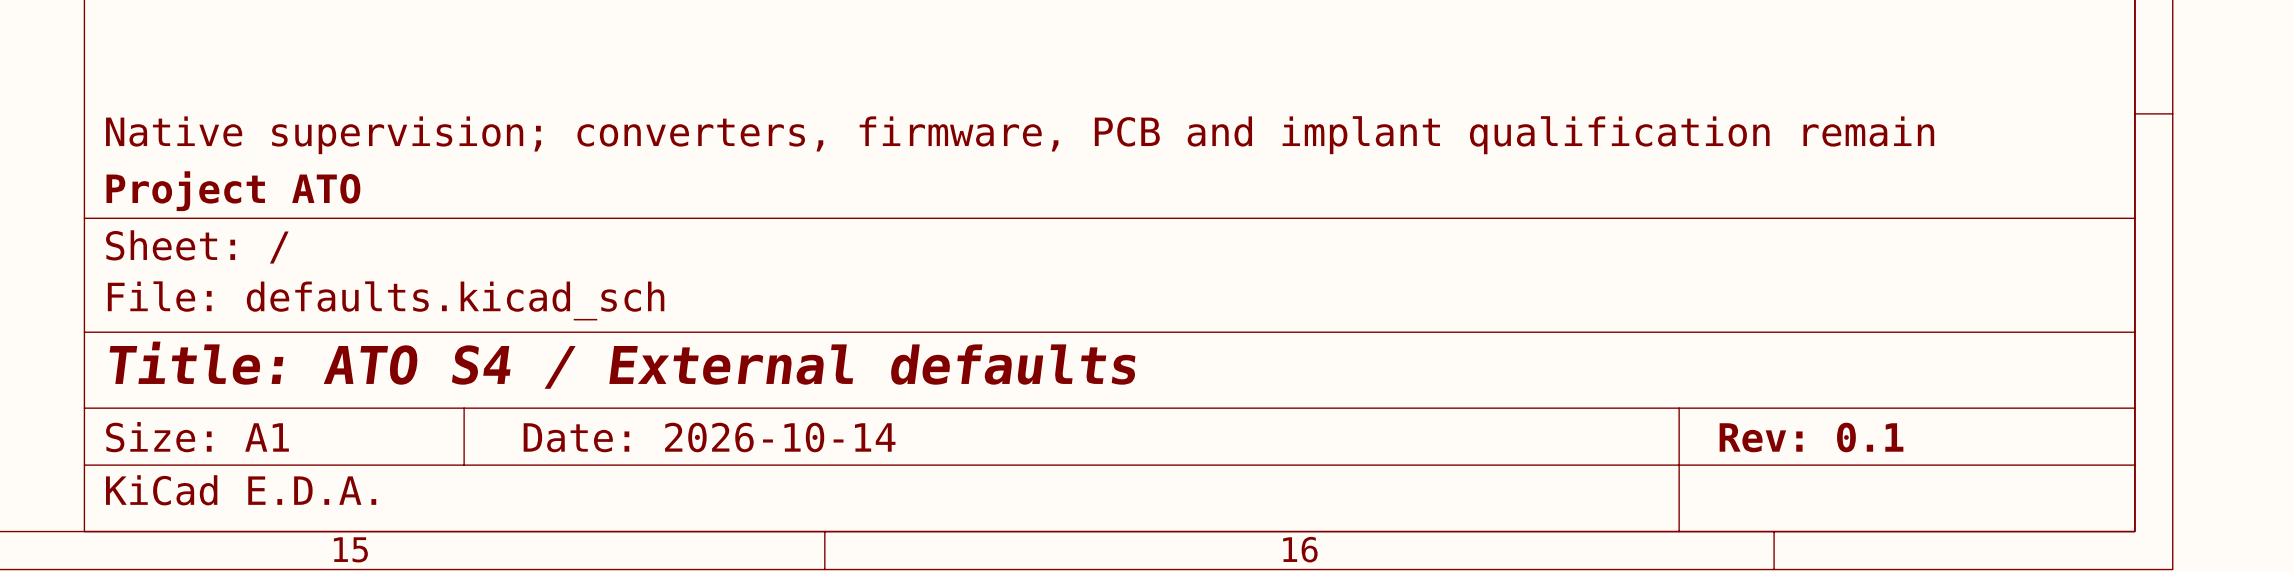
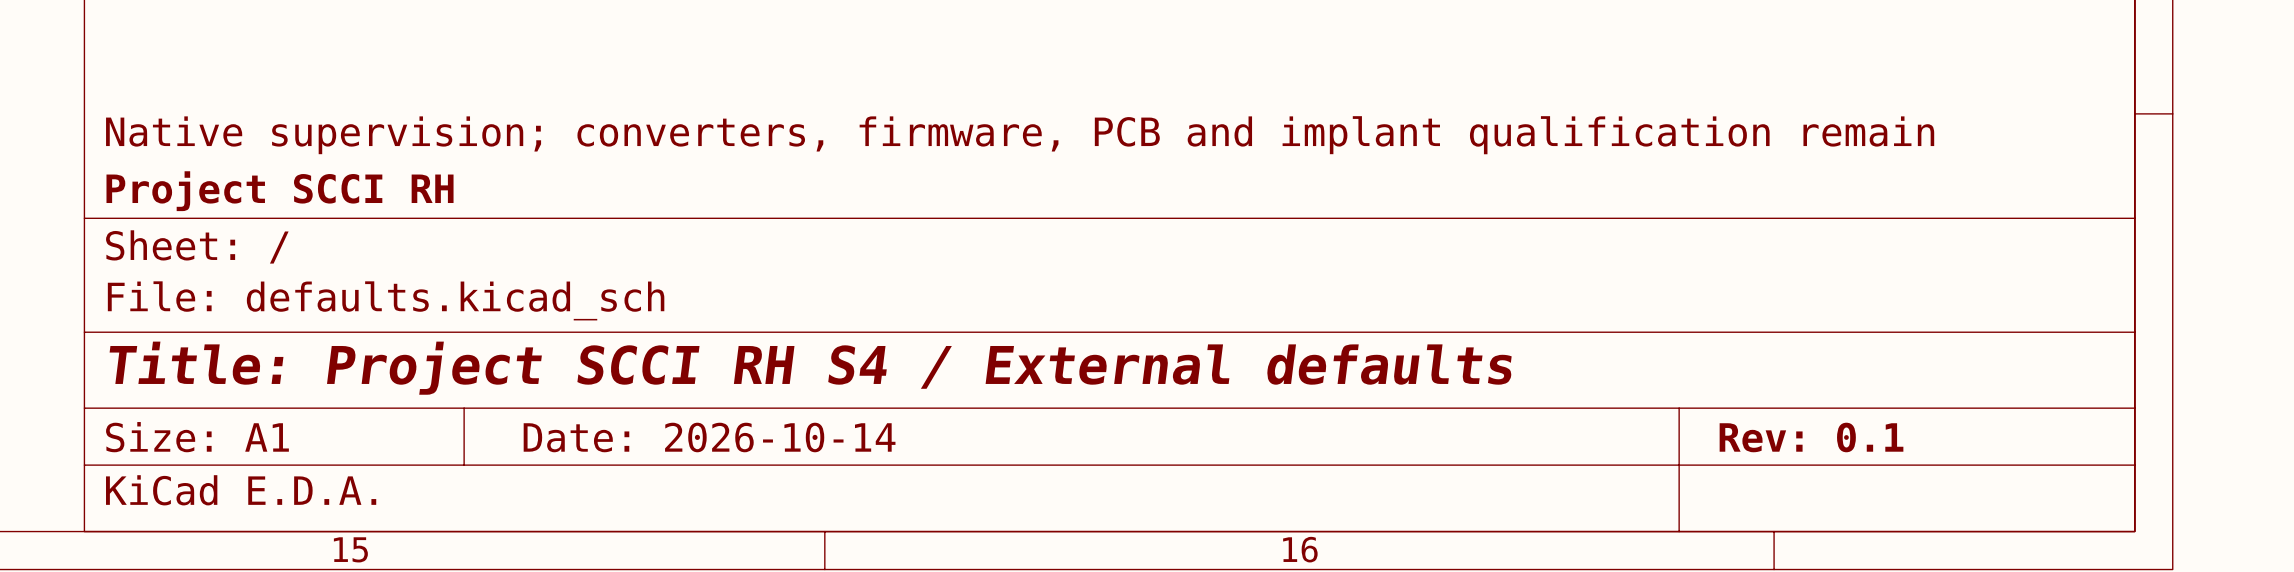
title block: Project ATO (233, 191) -> Project SCCI RH (280, 191)
title block: Title: ATO S4 / External defaults (622, 365) -> Title: Project SCCI RH S4 / External defaults (810, 368)

